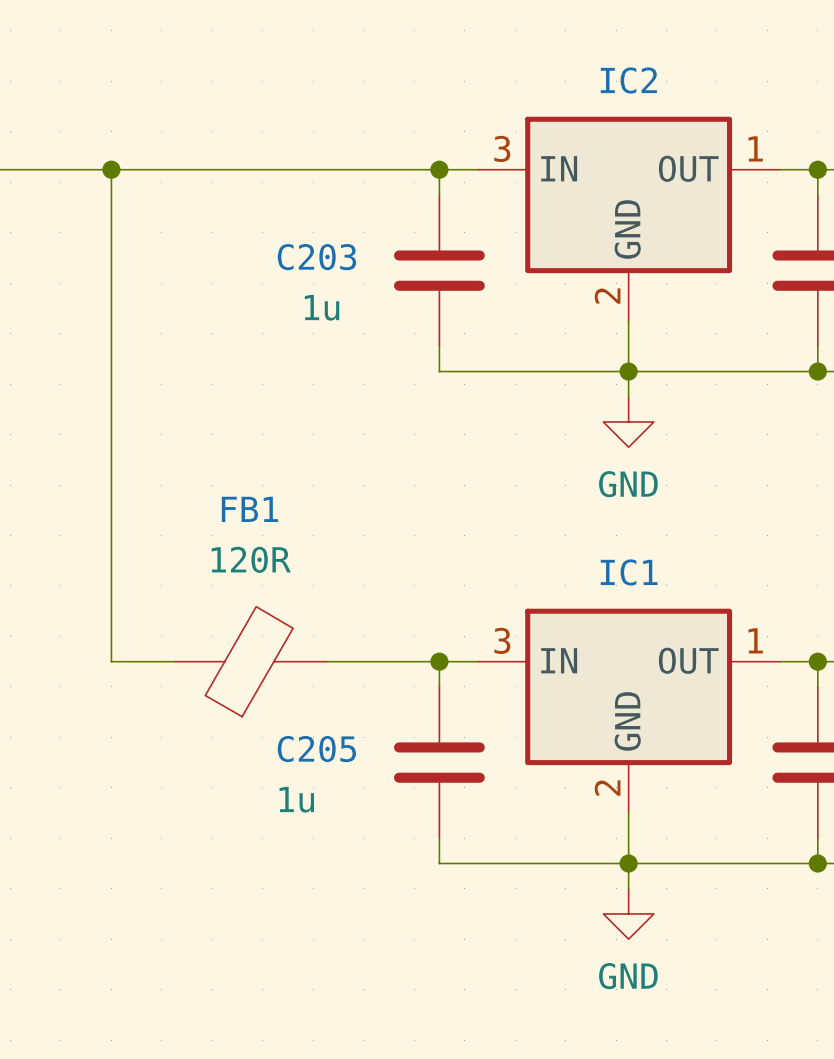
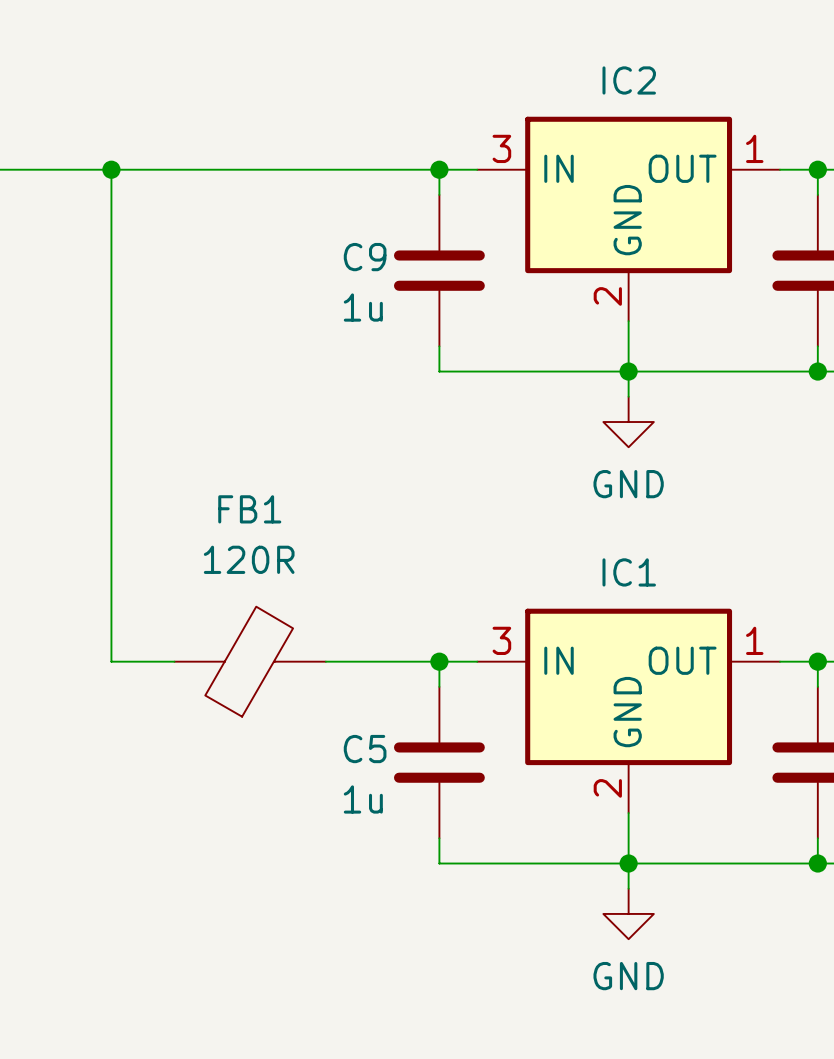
C203 name: C203 (316, 257) -> C9 (365, 257)
C203 value position: 1u (322, 307) -> 1u (363, 307)
C205 name: C205 (316, 749) -> C5 (365, 749)
C205 value position: 1u (296, 799) -> 1u (363, 799)

